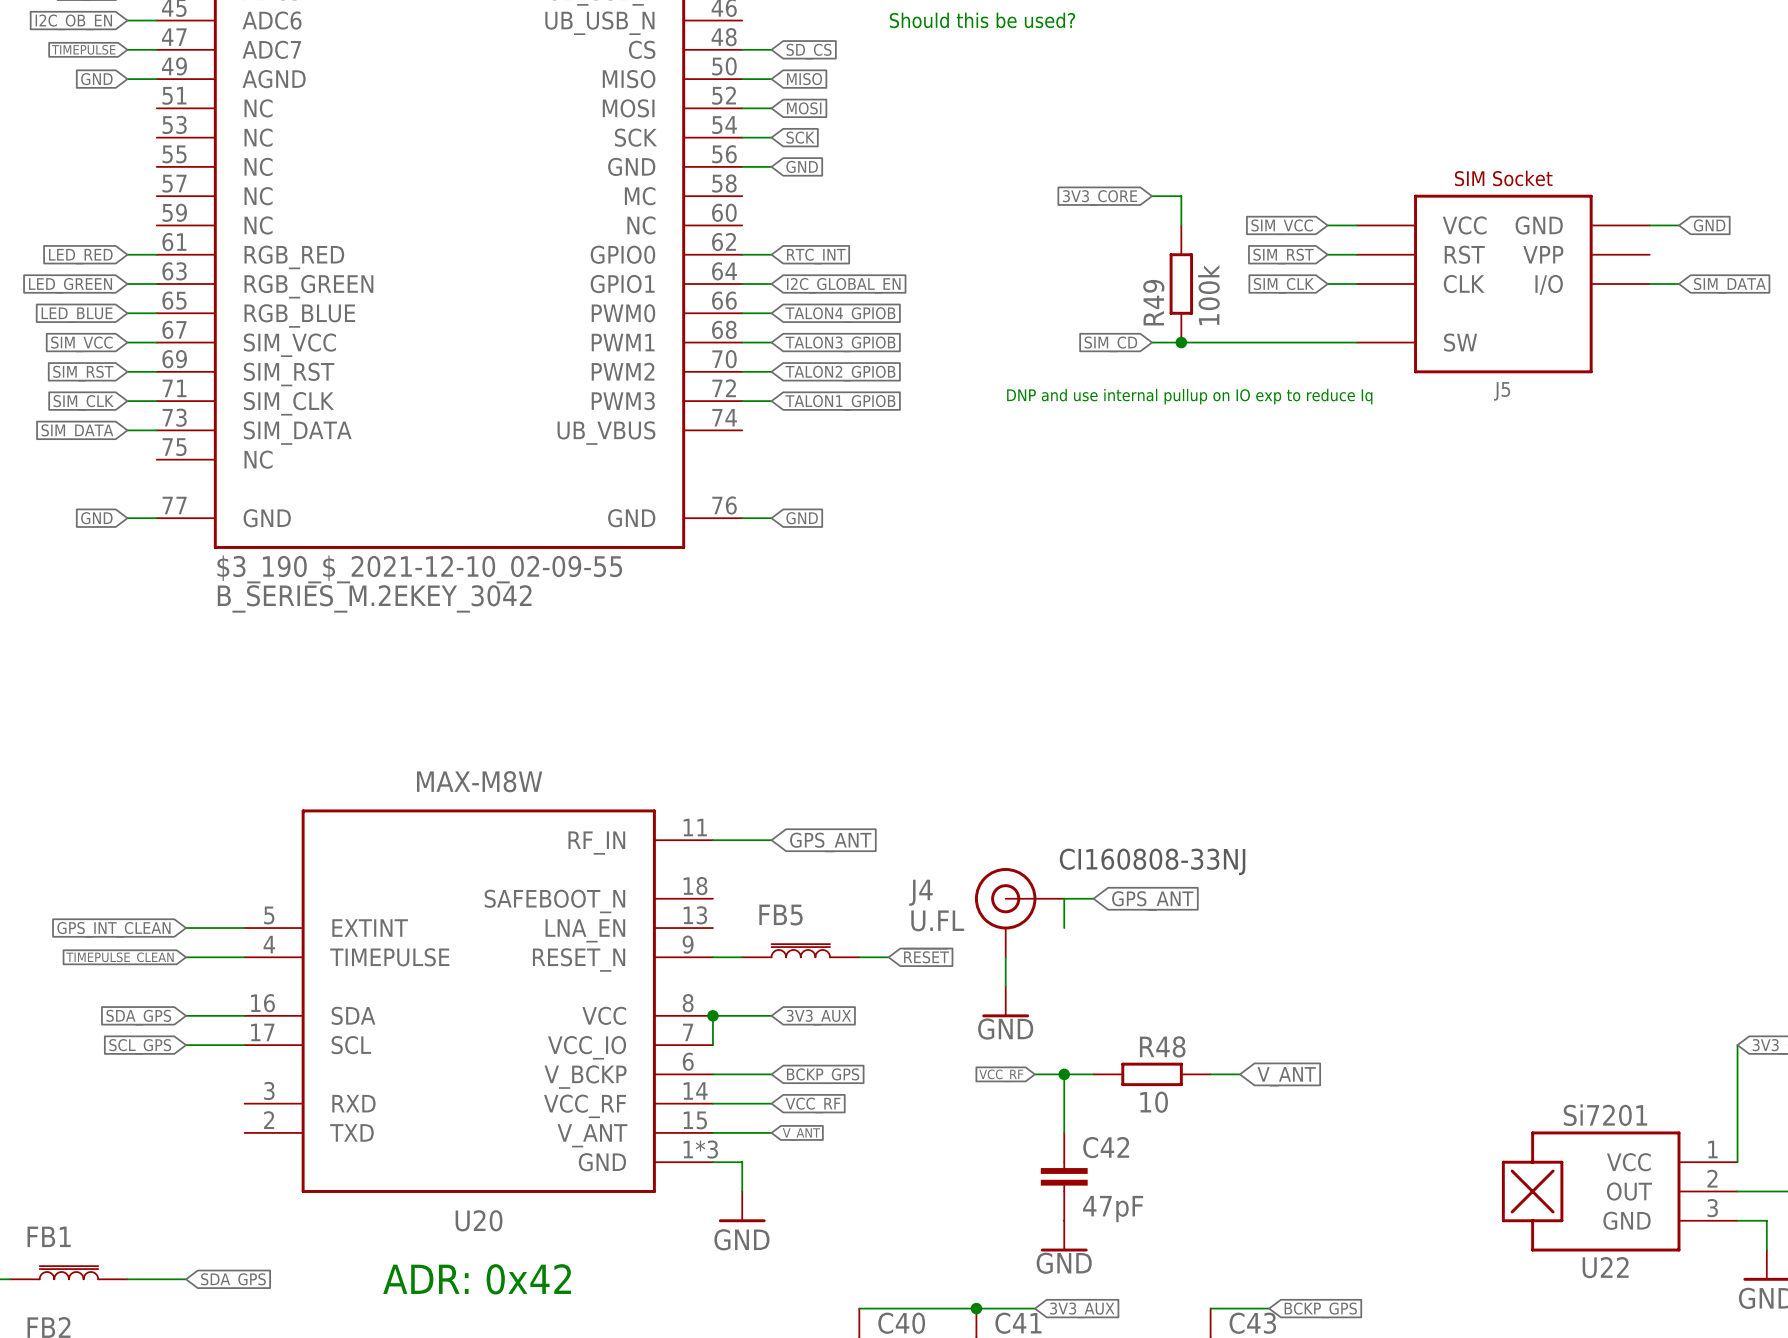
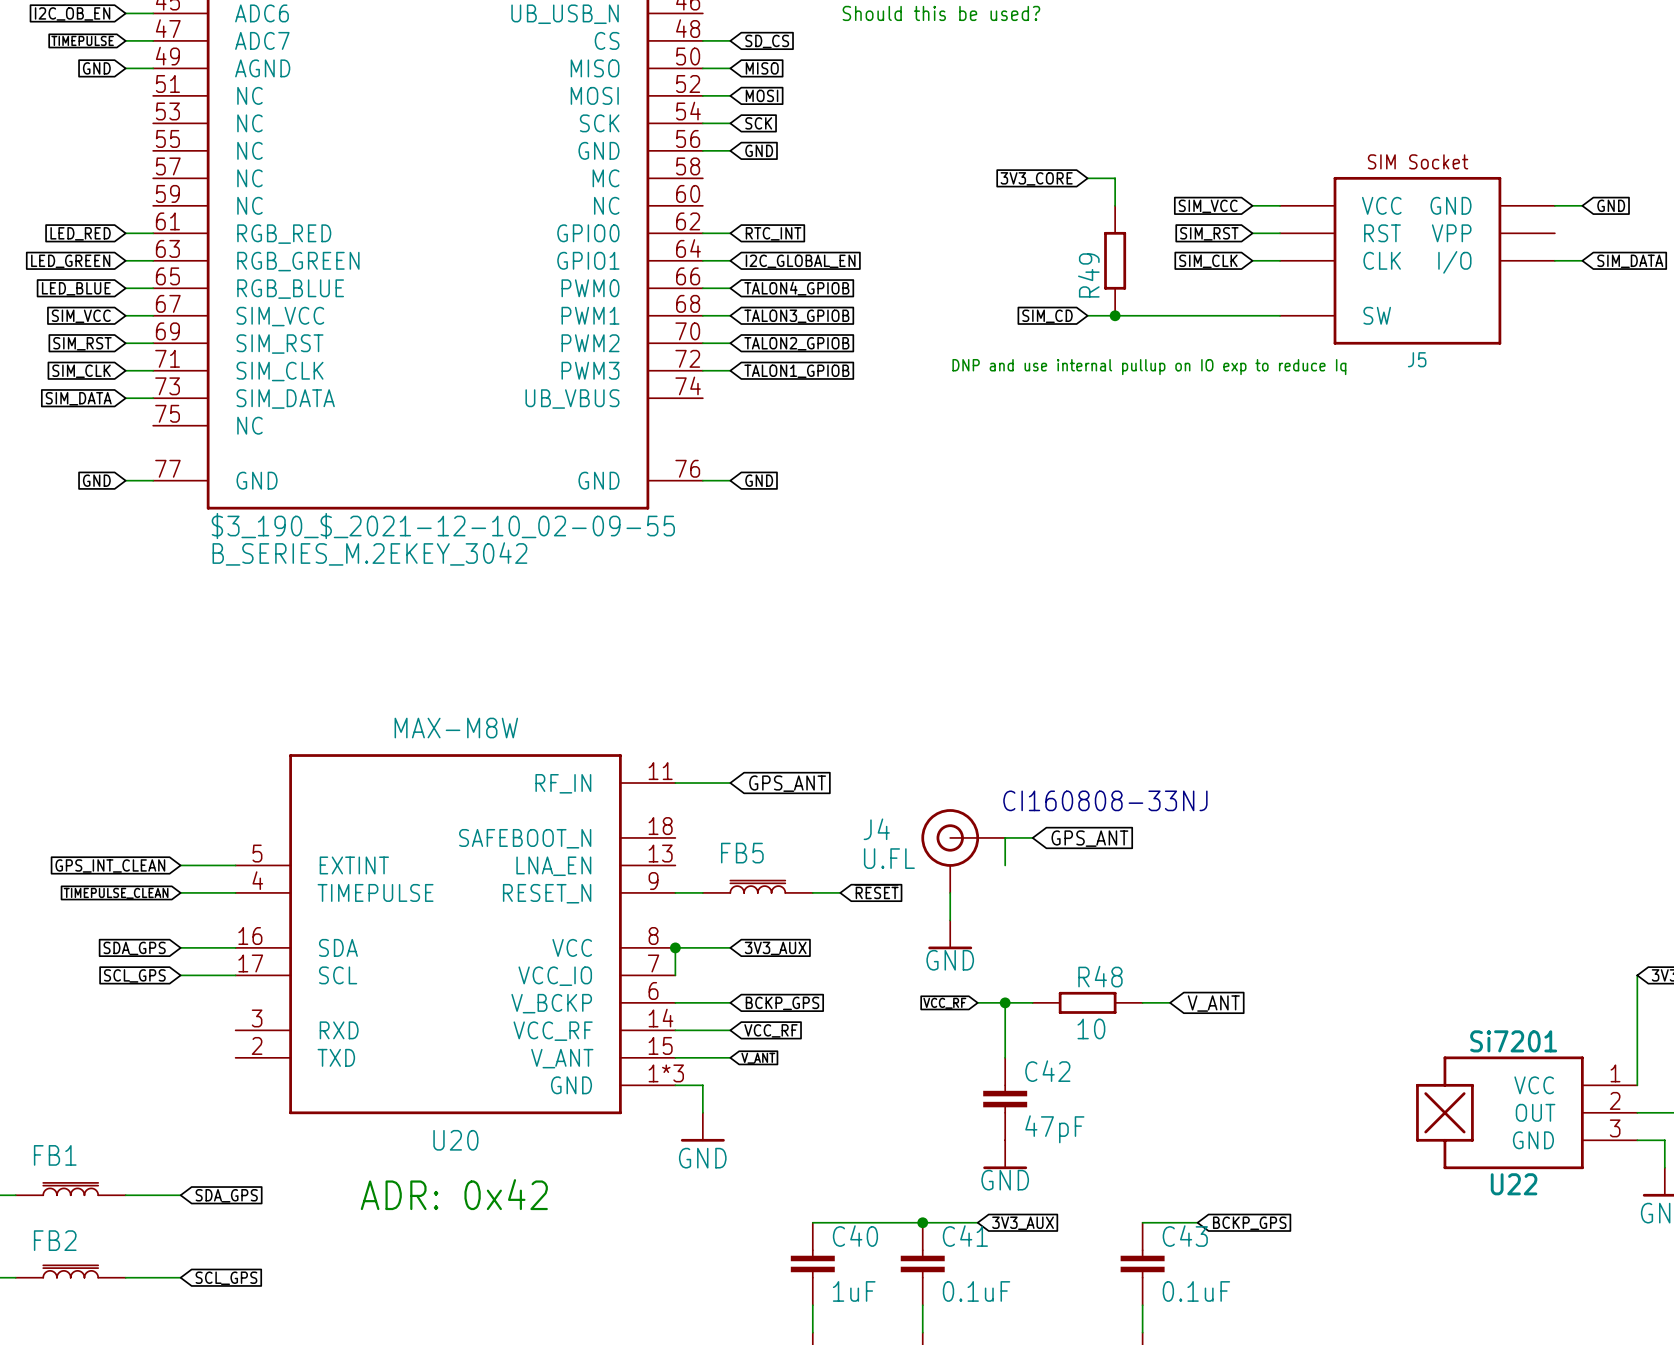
R49 value: 100k (1208, 295) -> none

